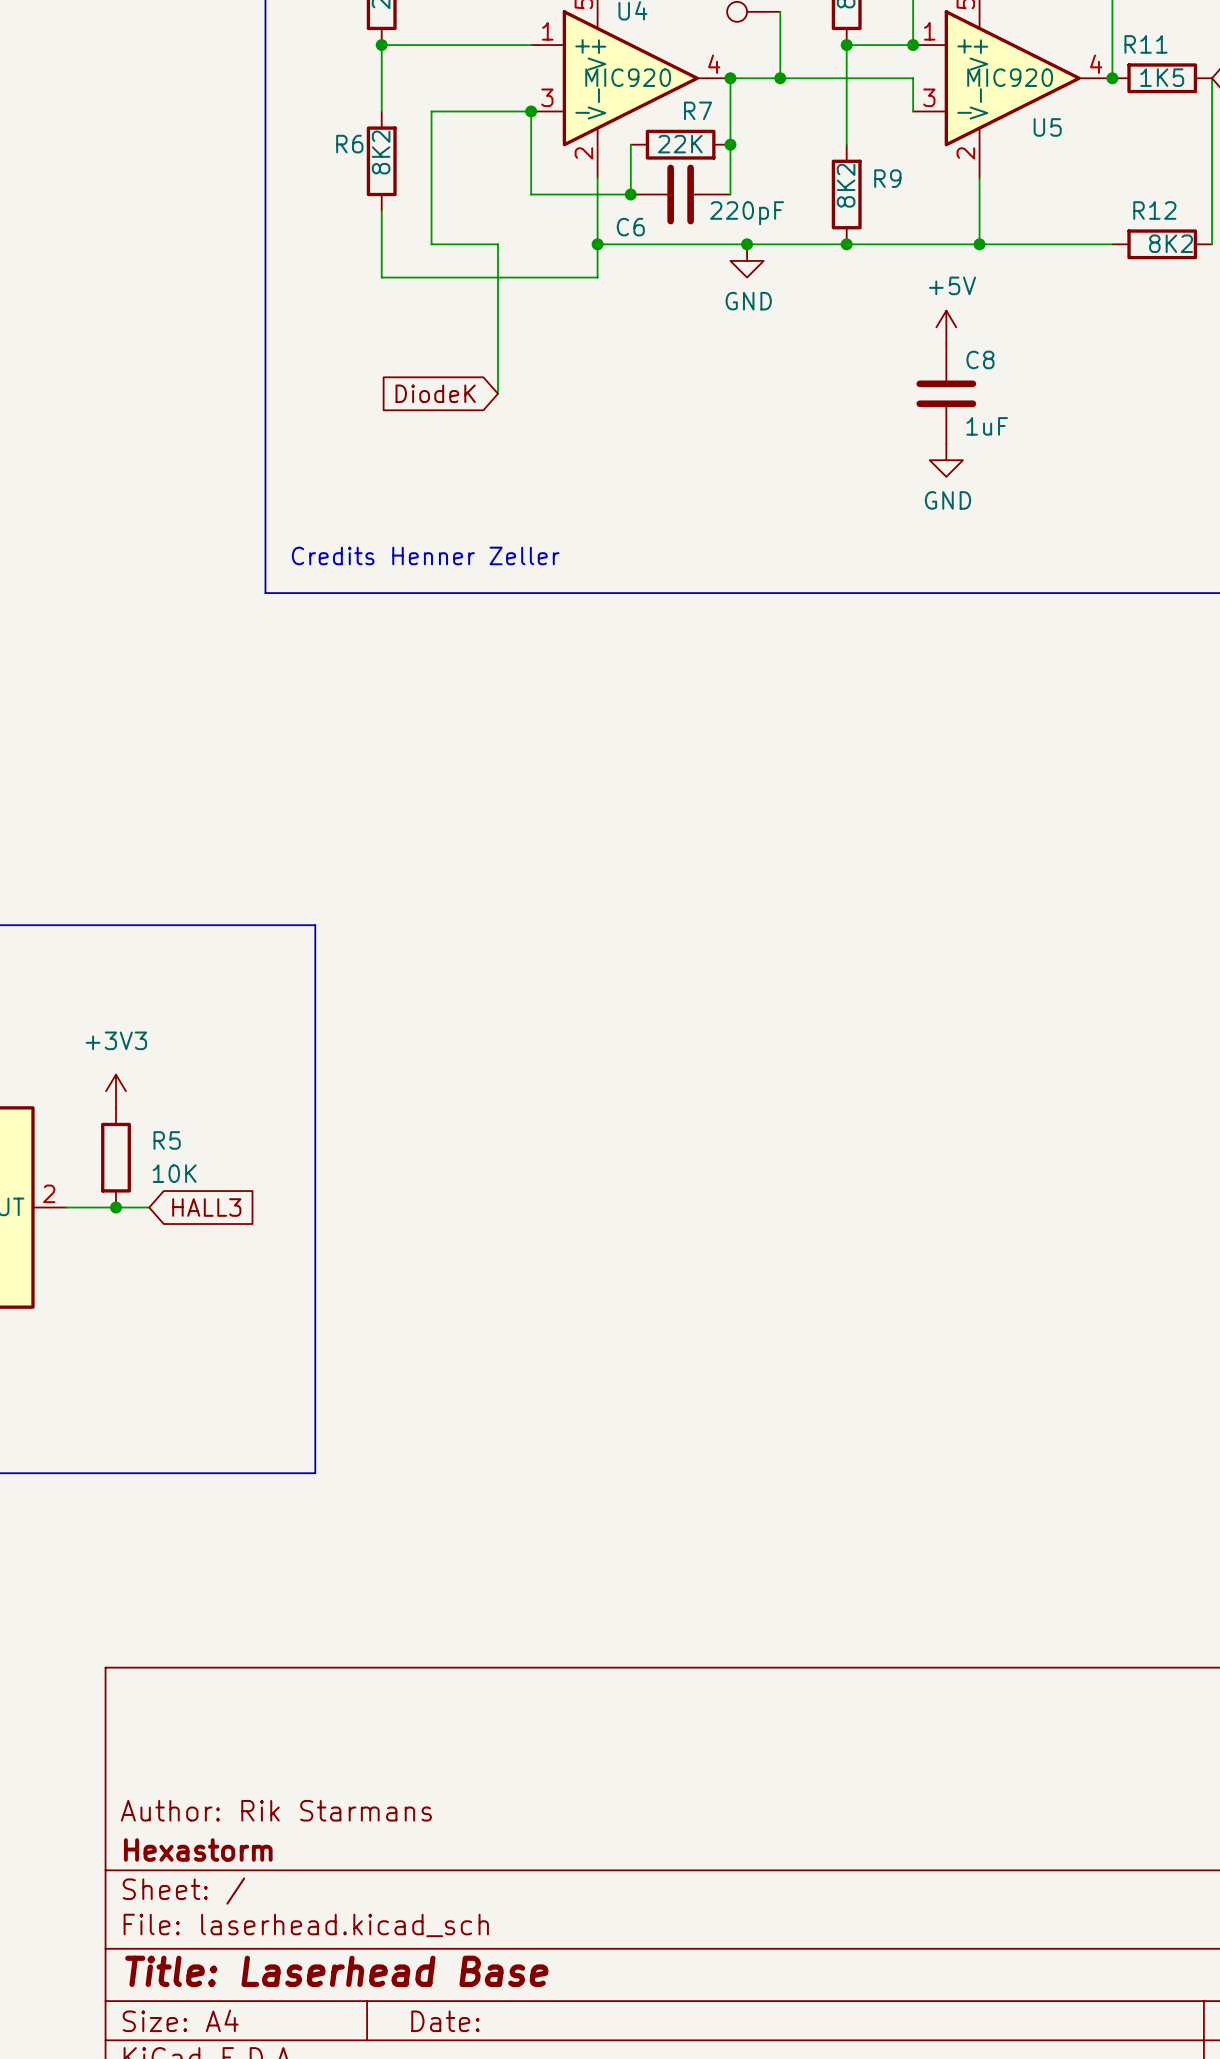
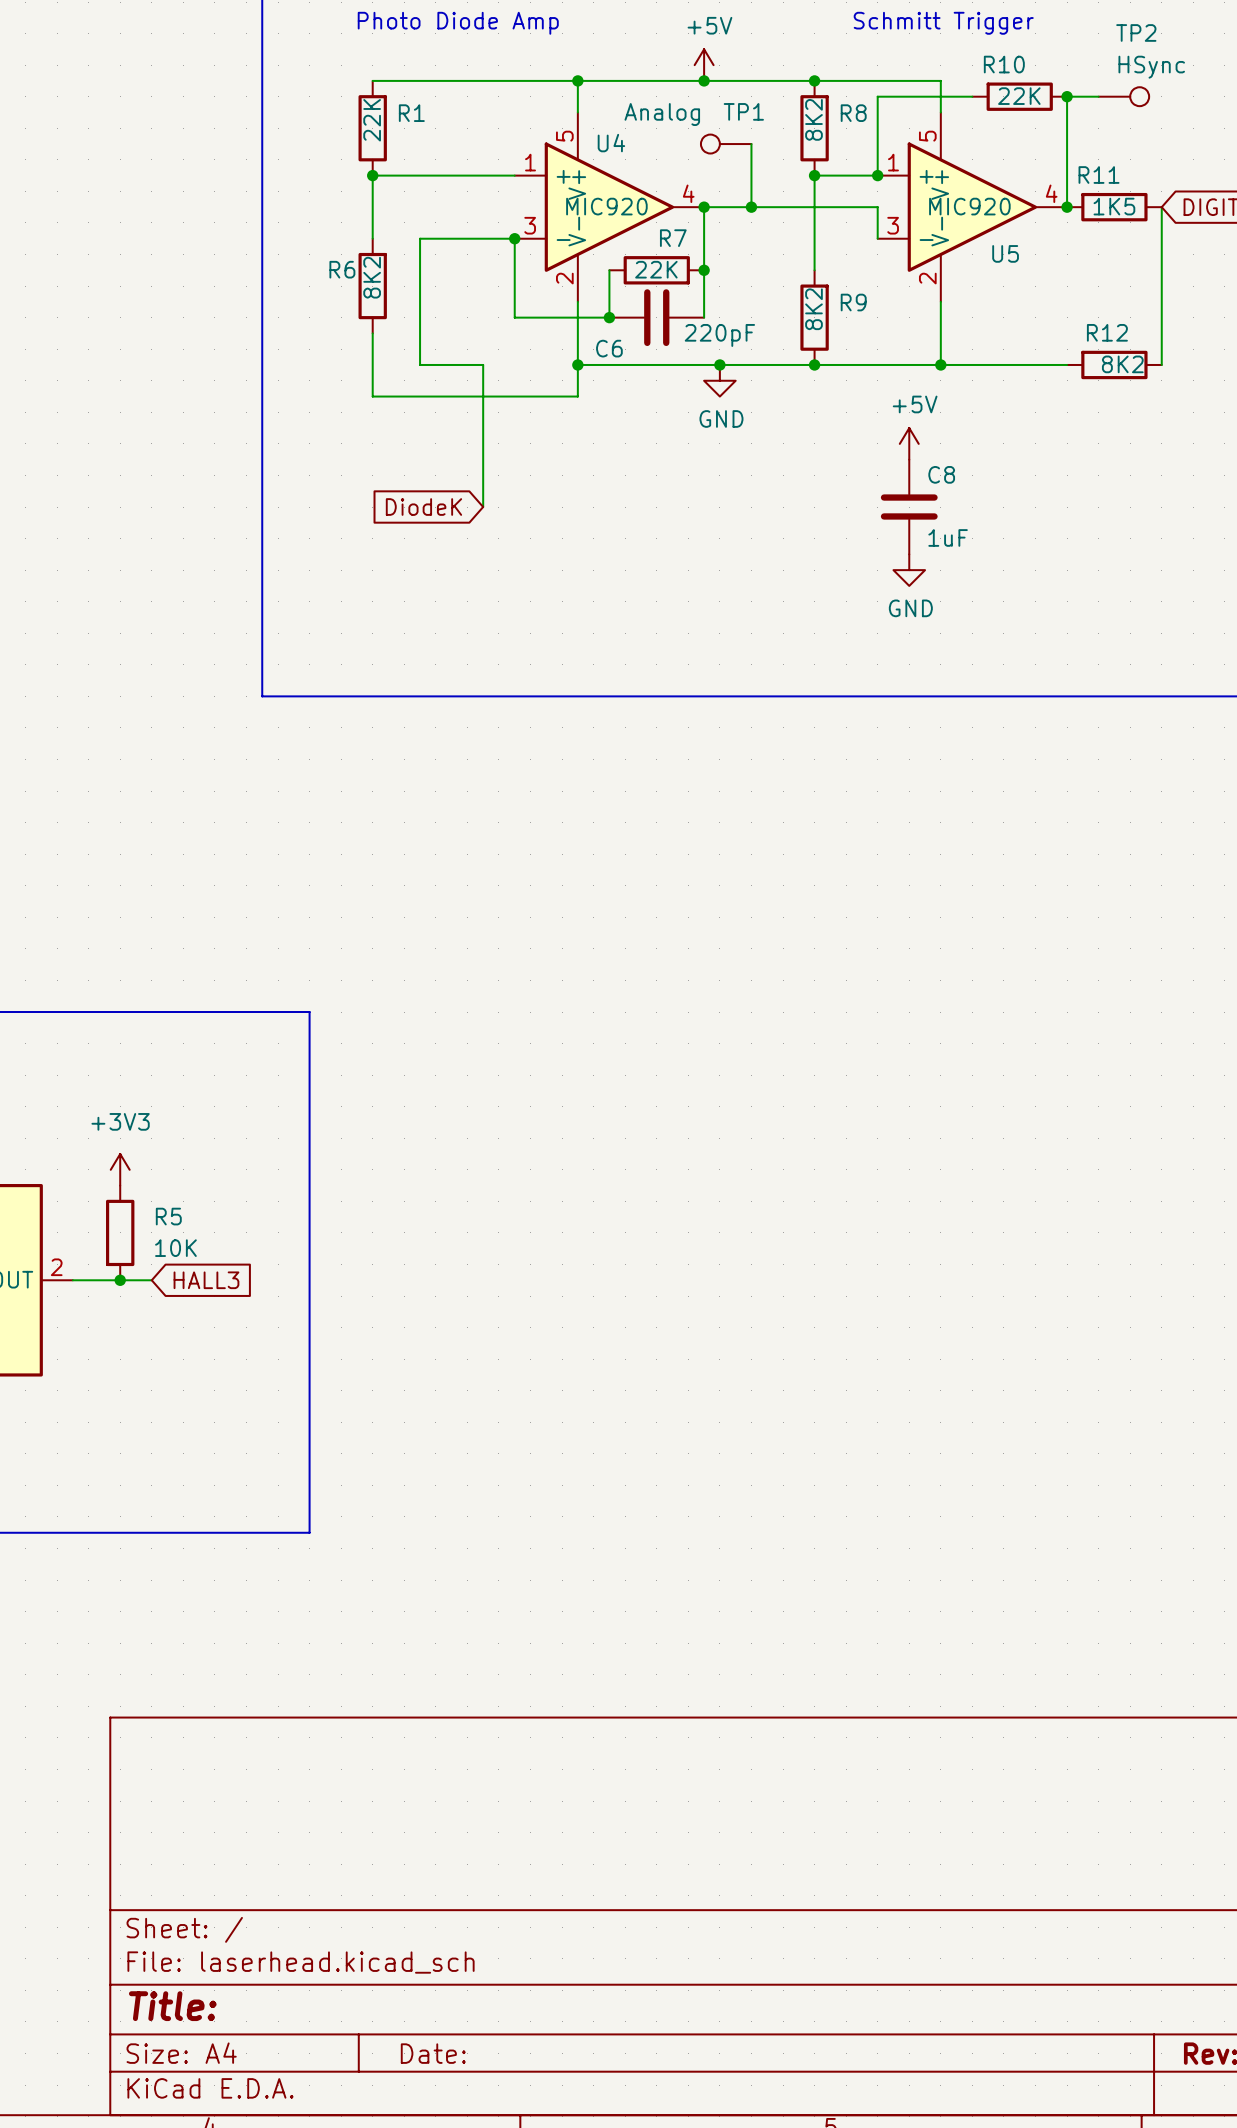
text: Credits Henner Zeller (425, 555) -> none
title block: Author: Rik Starmans (276, 1810) -> none
title block: Hexastorm (198, 1849) -> none
title block: Title: Laserhead Base (336, 1971) -> Title: (172, 2006)

